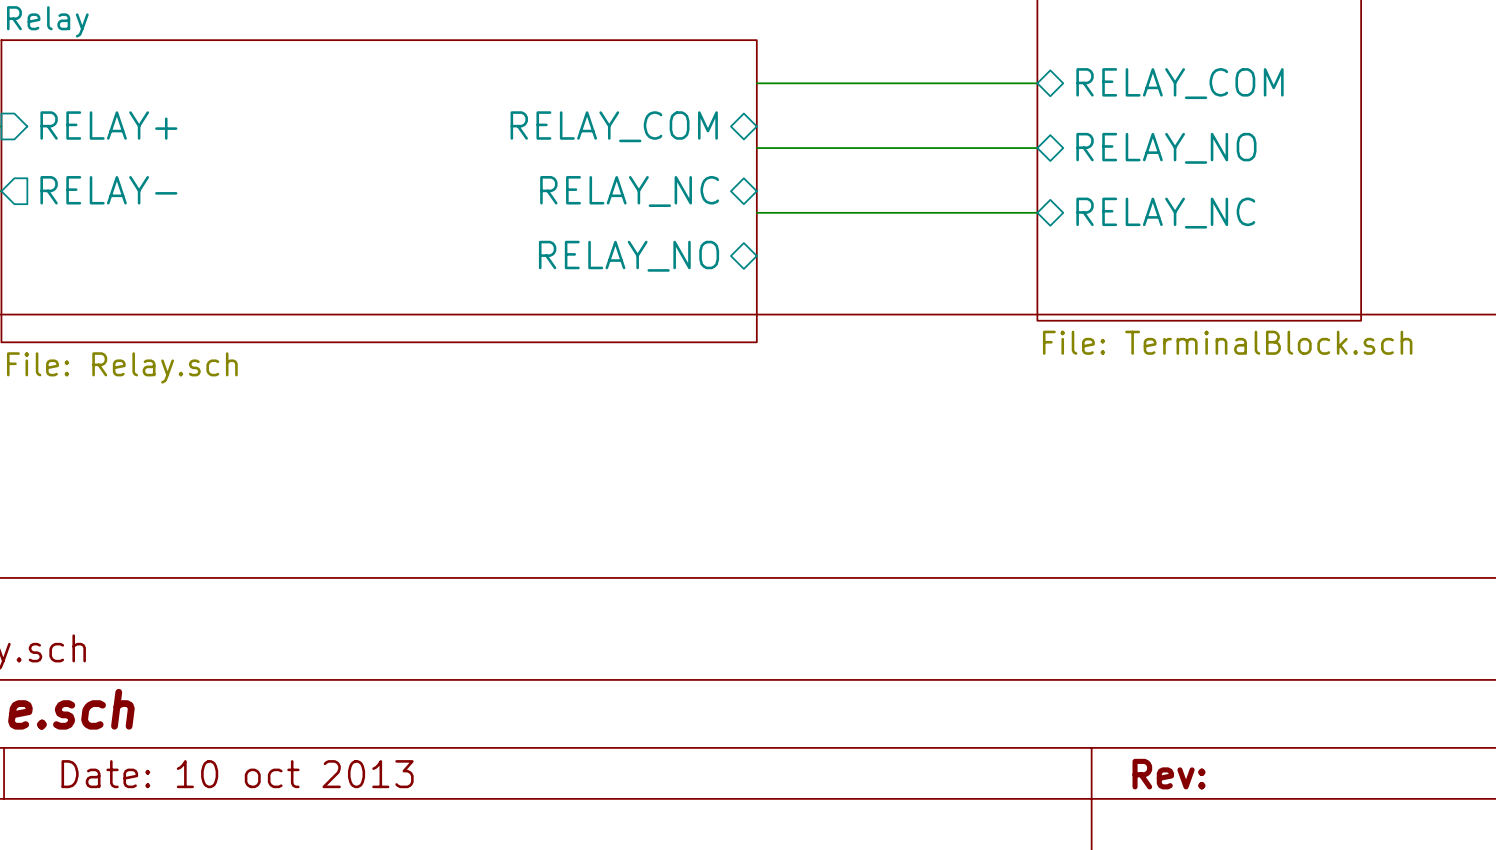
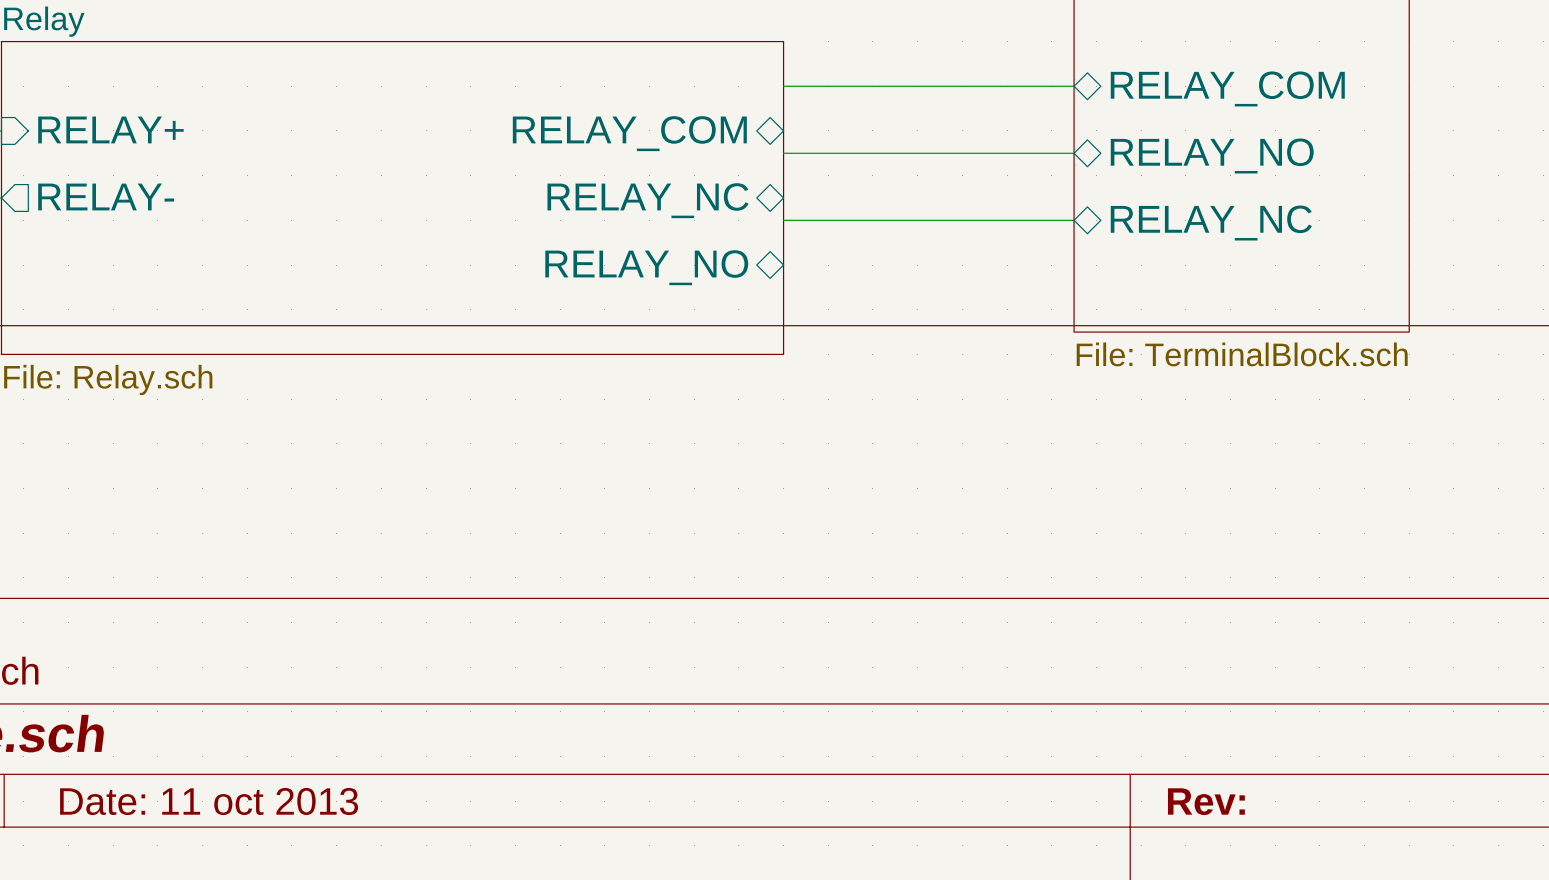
title block: Date: 10 oct 2013 (237, 774) -> Date: 11 oct 2013 (209, 801)

